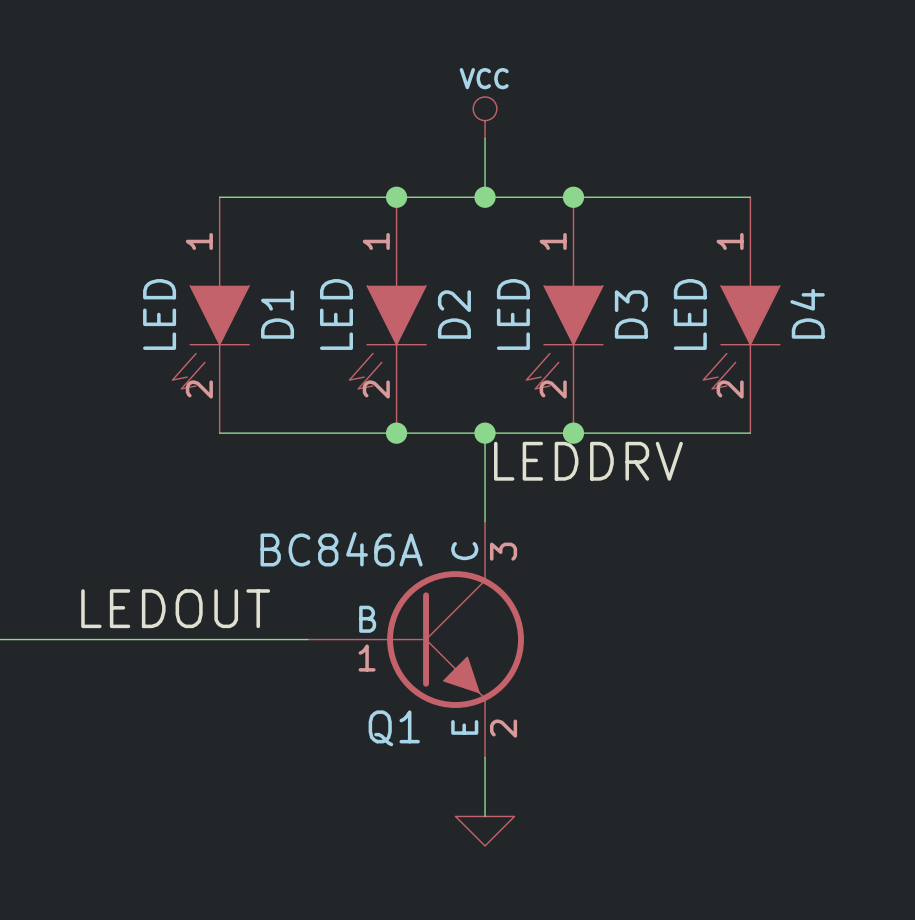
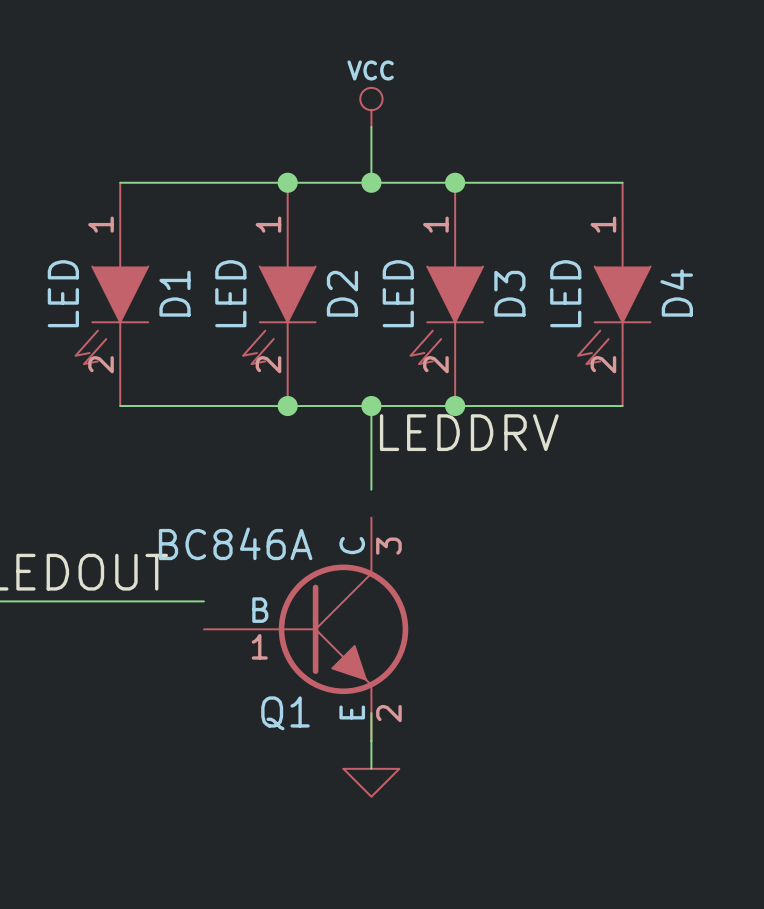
Q1 position: (416, 639) -> (306, 629)

